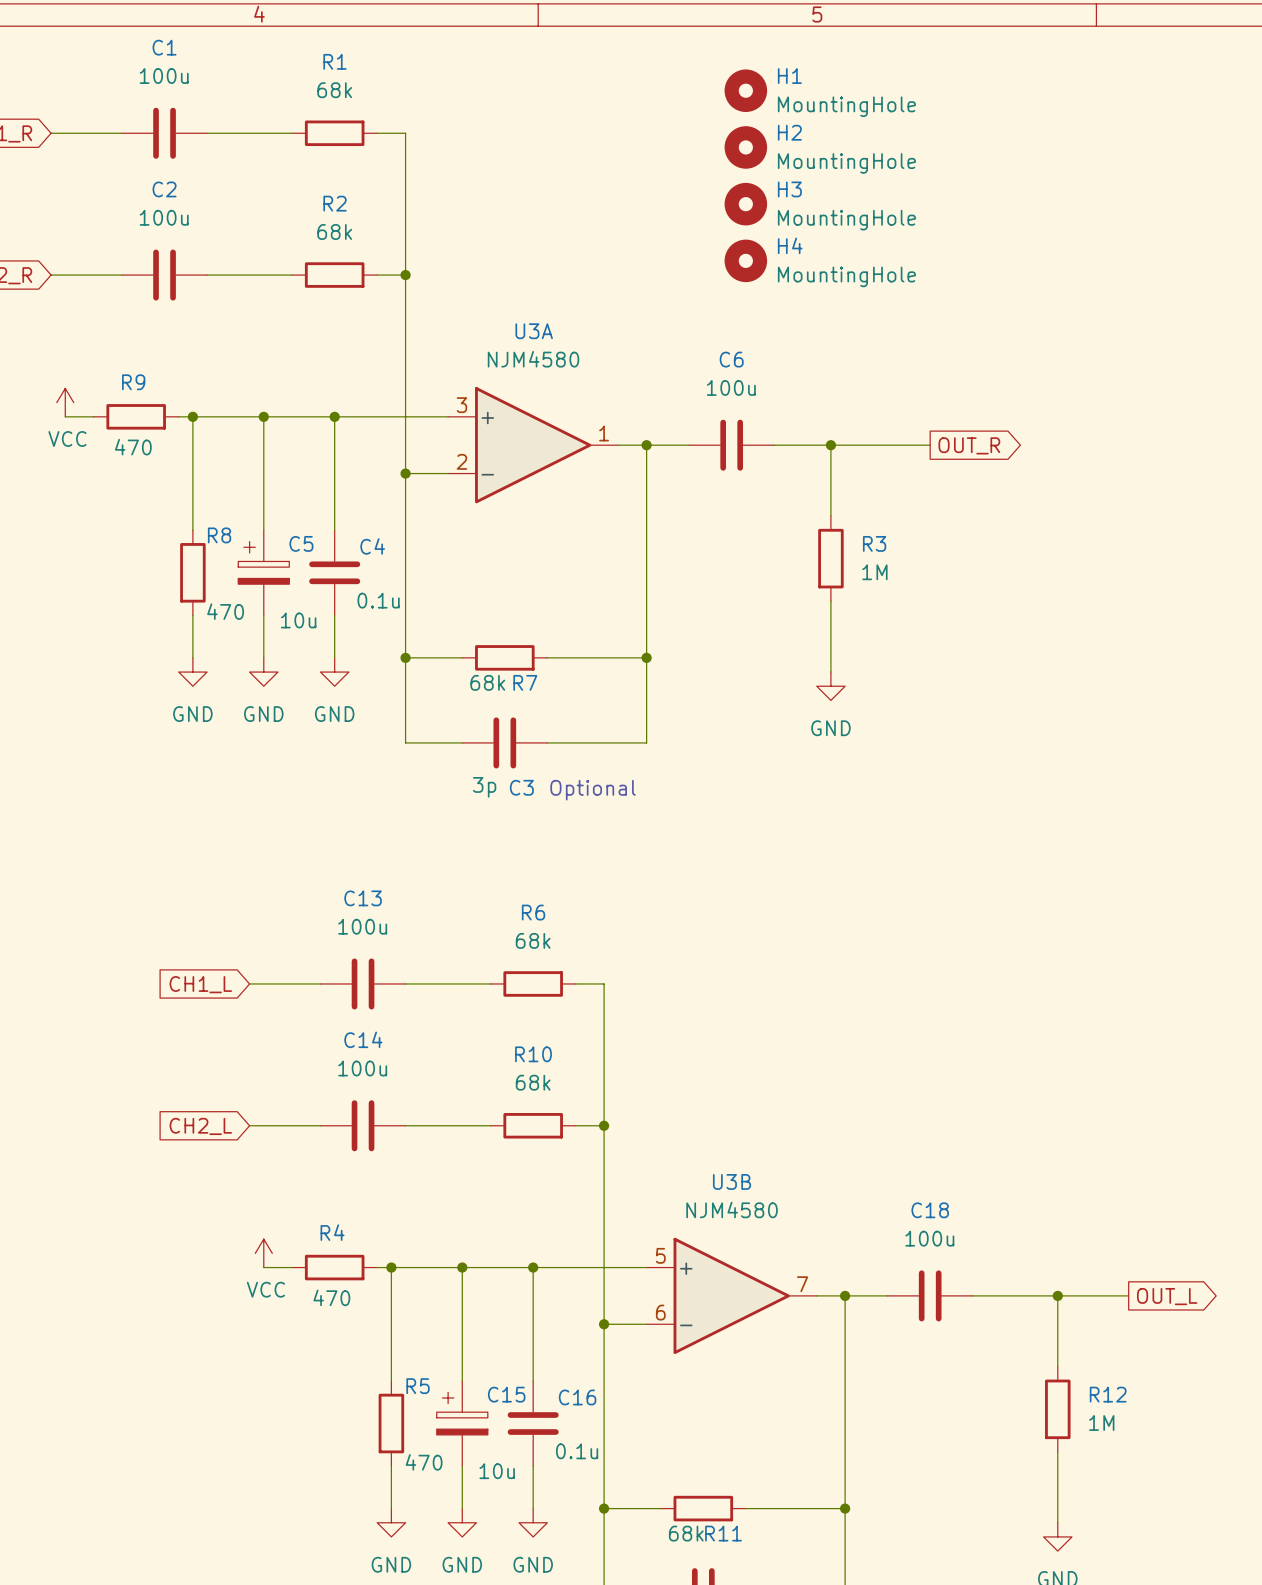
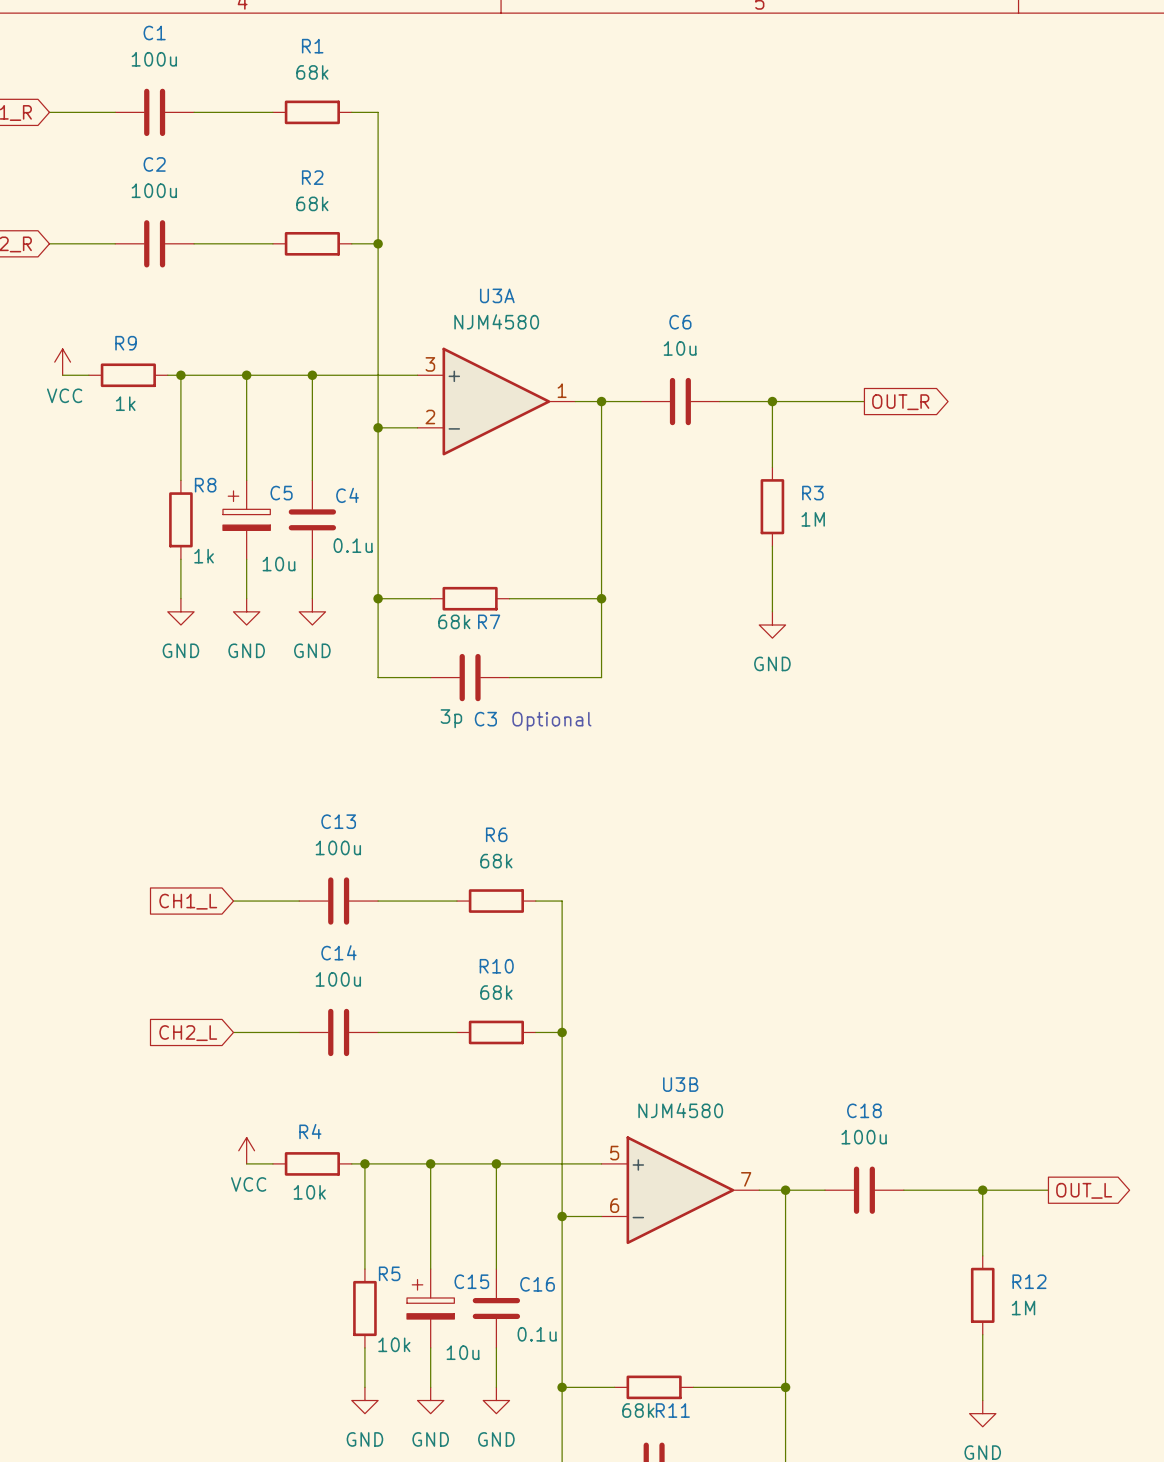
H1: MountingHole (745, 90) -> none
H2: MountingHole (745, 147) -> none
H3: MountingHole (745, 204) -> none
H4: MountingHole (745, 260) -> none
C6 value: 100u (731, 387) -> 10u (680, 348)
R9 value: 470 (133, 447) -> 1k (125, 403)
R8 value: 470 (225, 611) -> 1k (204, 556)
R4 value: 470 (331, 1297) -> 10k (309, 1192)
R5 value: 470 (424, 1462) -> 10k (394, 1344)

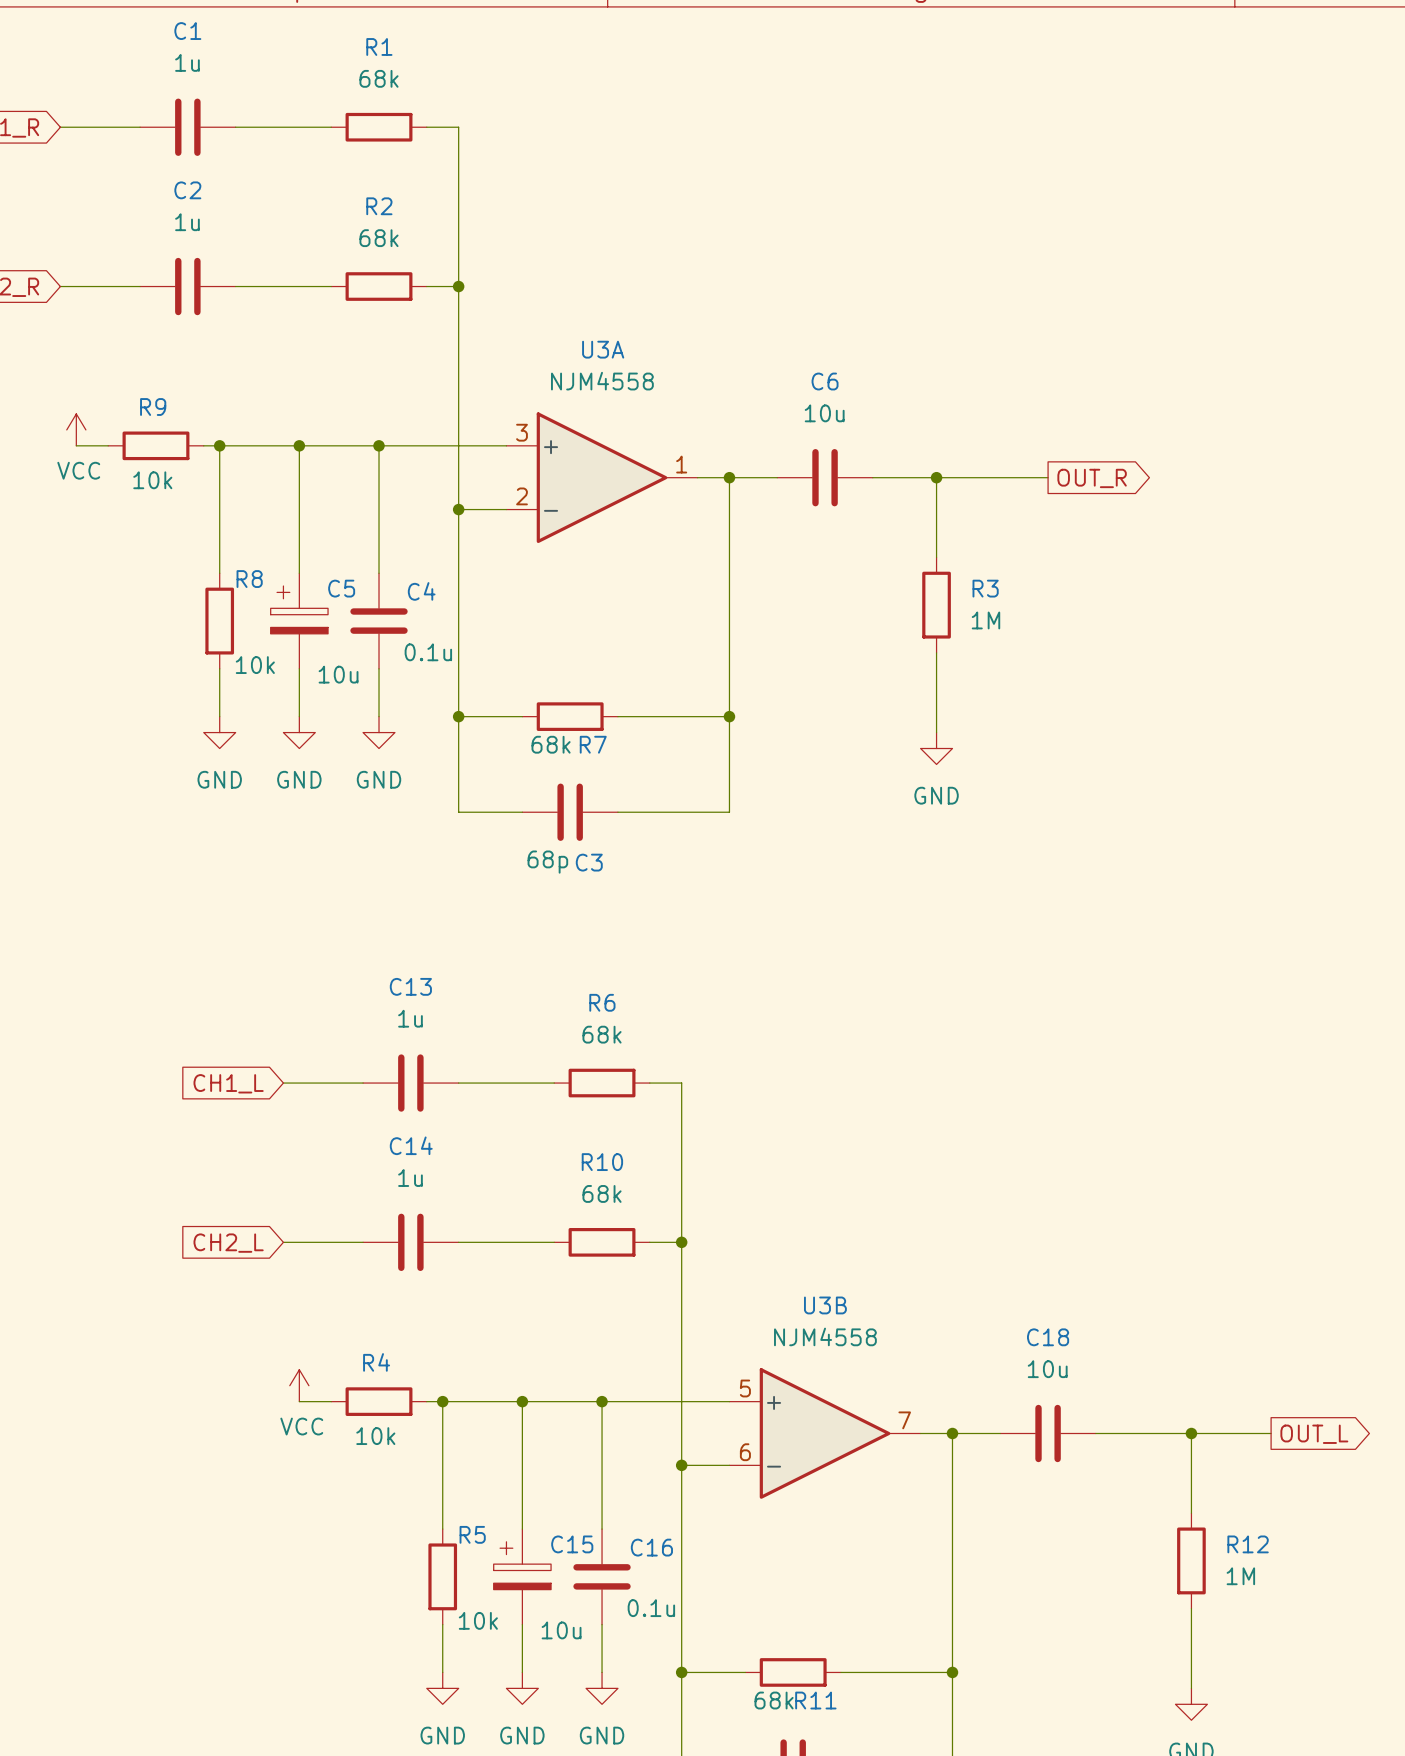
C1 value: 100u (154, 59) -> 1u (187, 62)
C2 value: 100u (154, 190) -> 1u (187, 222)
U3A value: NJM4580 (496, 321) -> NJM4558 (602, 381)
R9 value: 1k (125, 403) -> 10k (152, 480)
R8 value: 1k (204, 556) -> 10k (255, 665)
C3 value: 3p (451, 718) -> 68p (547, 862)
text: Optional (551, 721) -> none
C13 value: 100u (338, 847) -> 1u (410, 1018)
C14 value: 100u (338, 979) -> 1u (410, 1178)
U3B value: NJM4580 (680, 1110) -> NJM4558 (825, 1336)
C18 value: 100u (864, 1137) -> 10u (1047, 1369)

